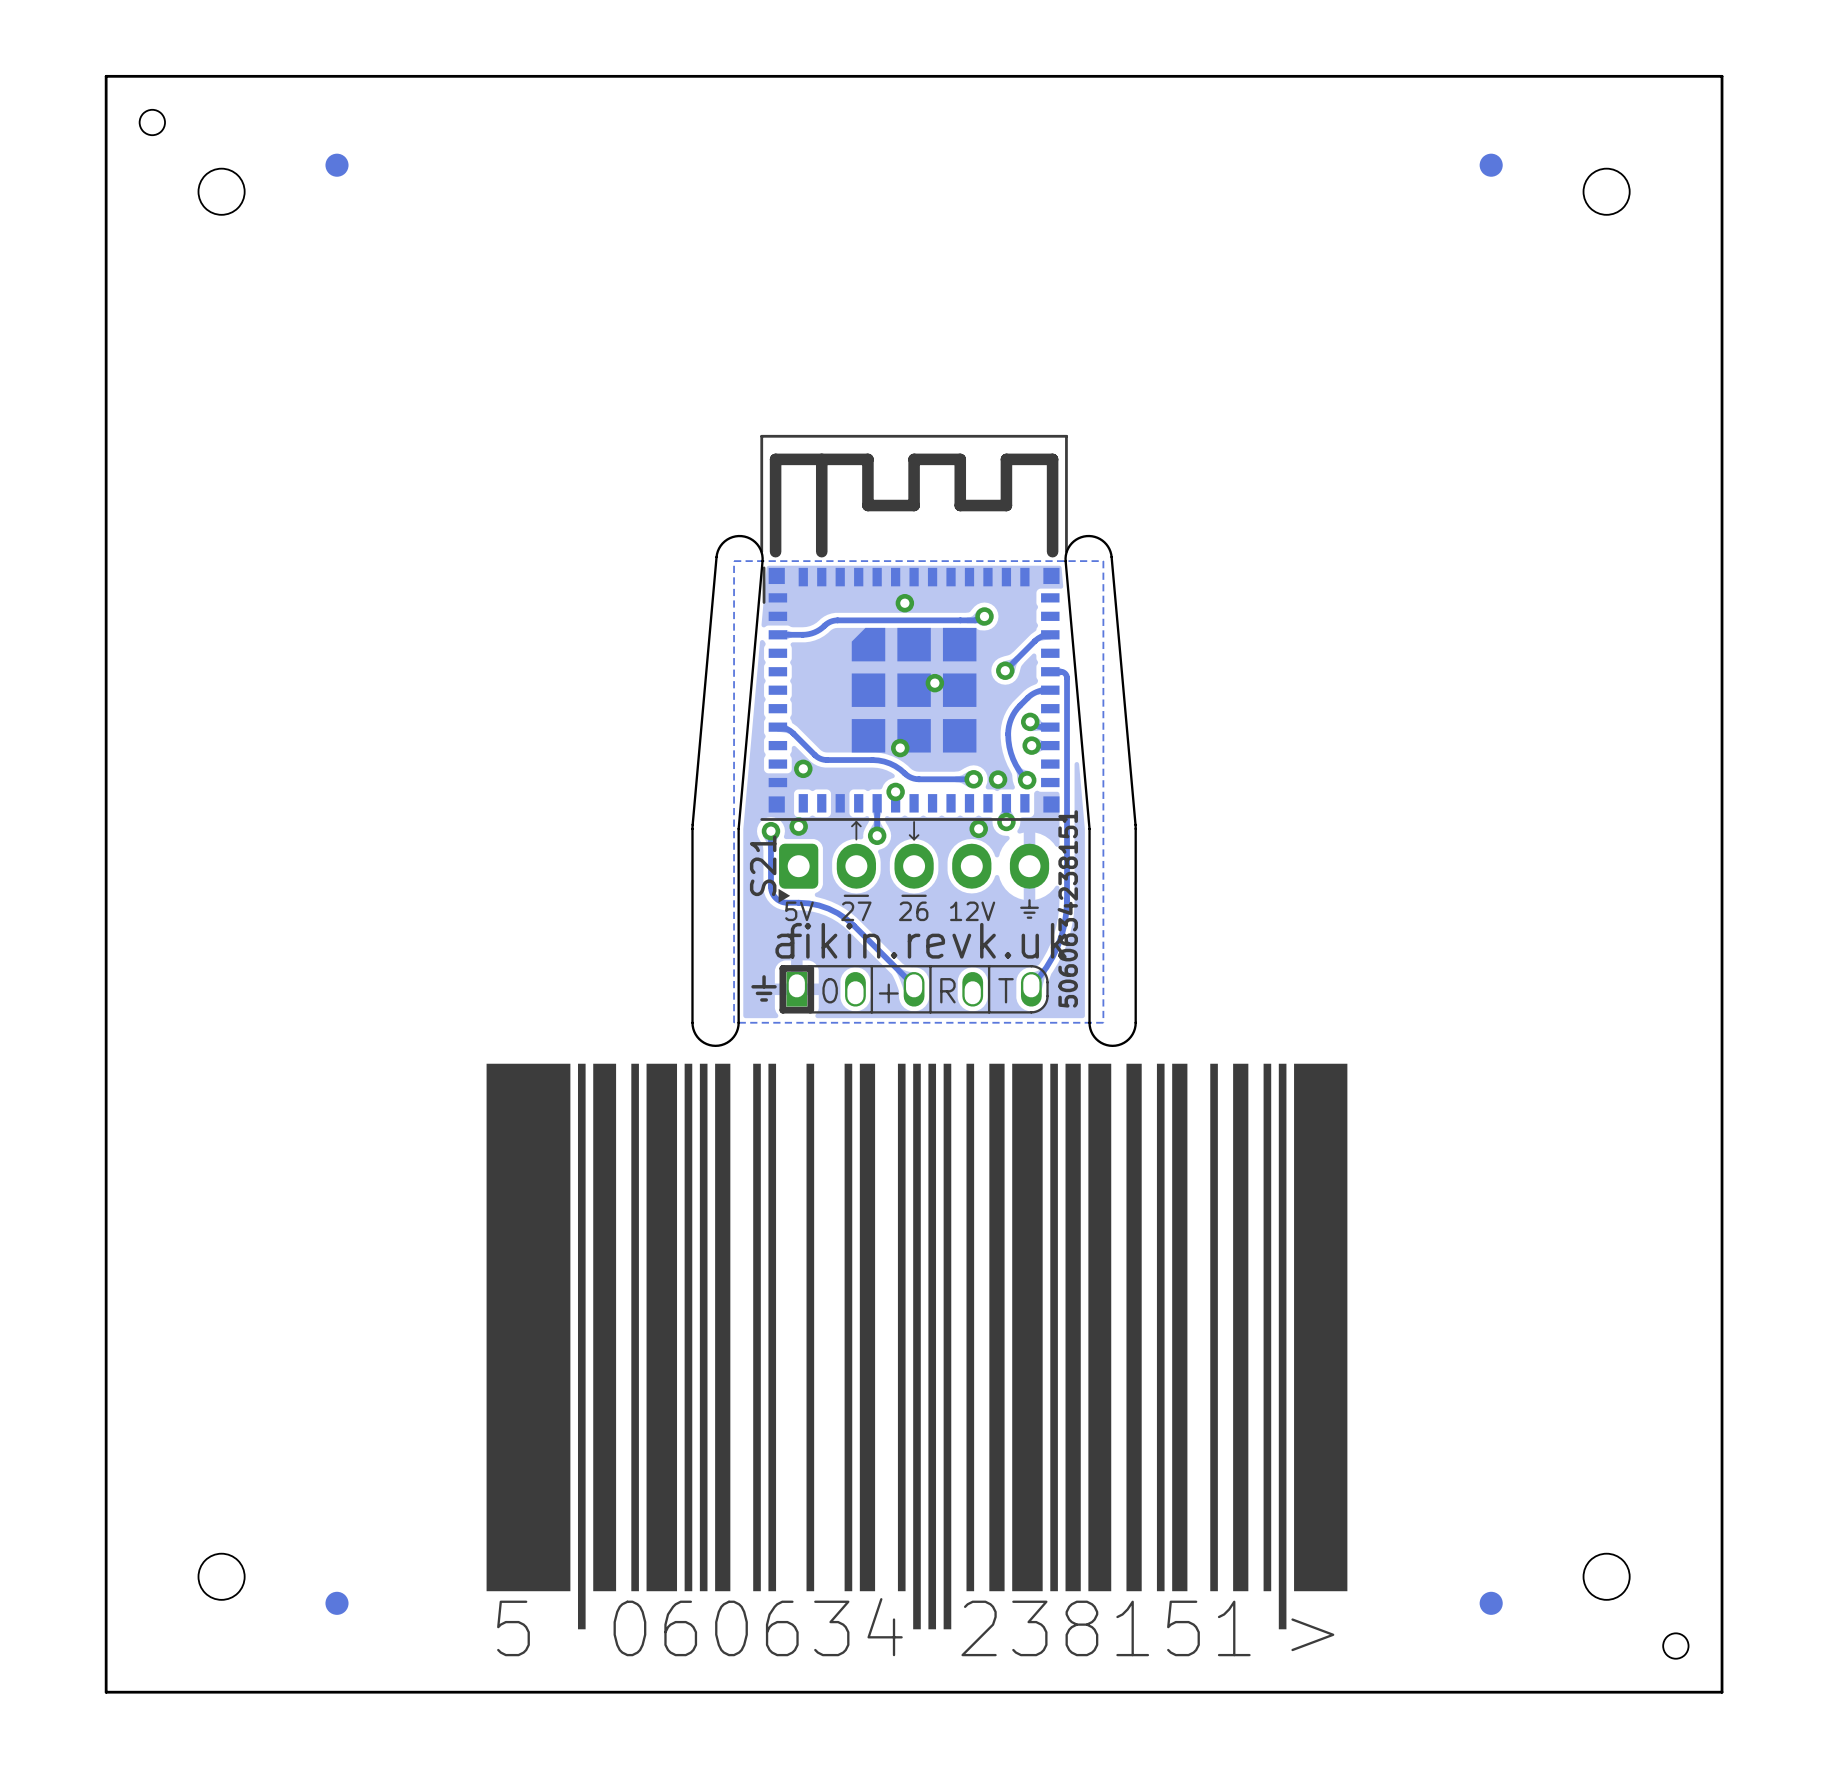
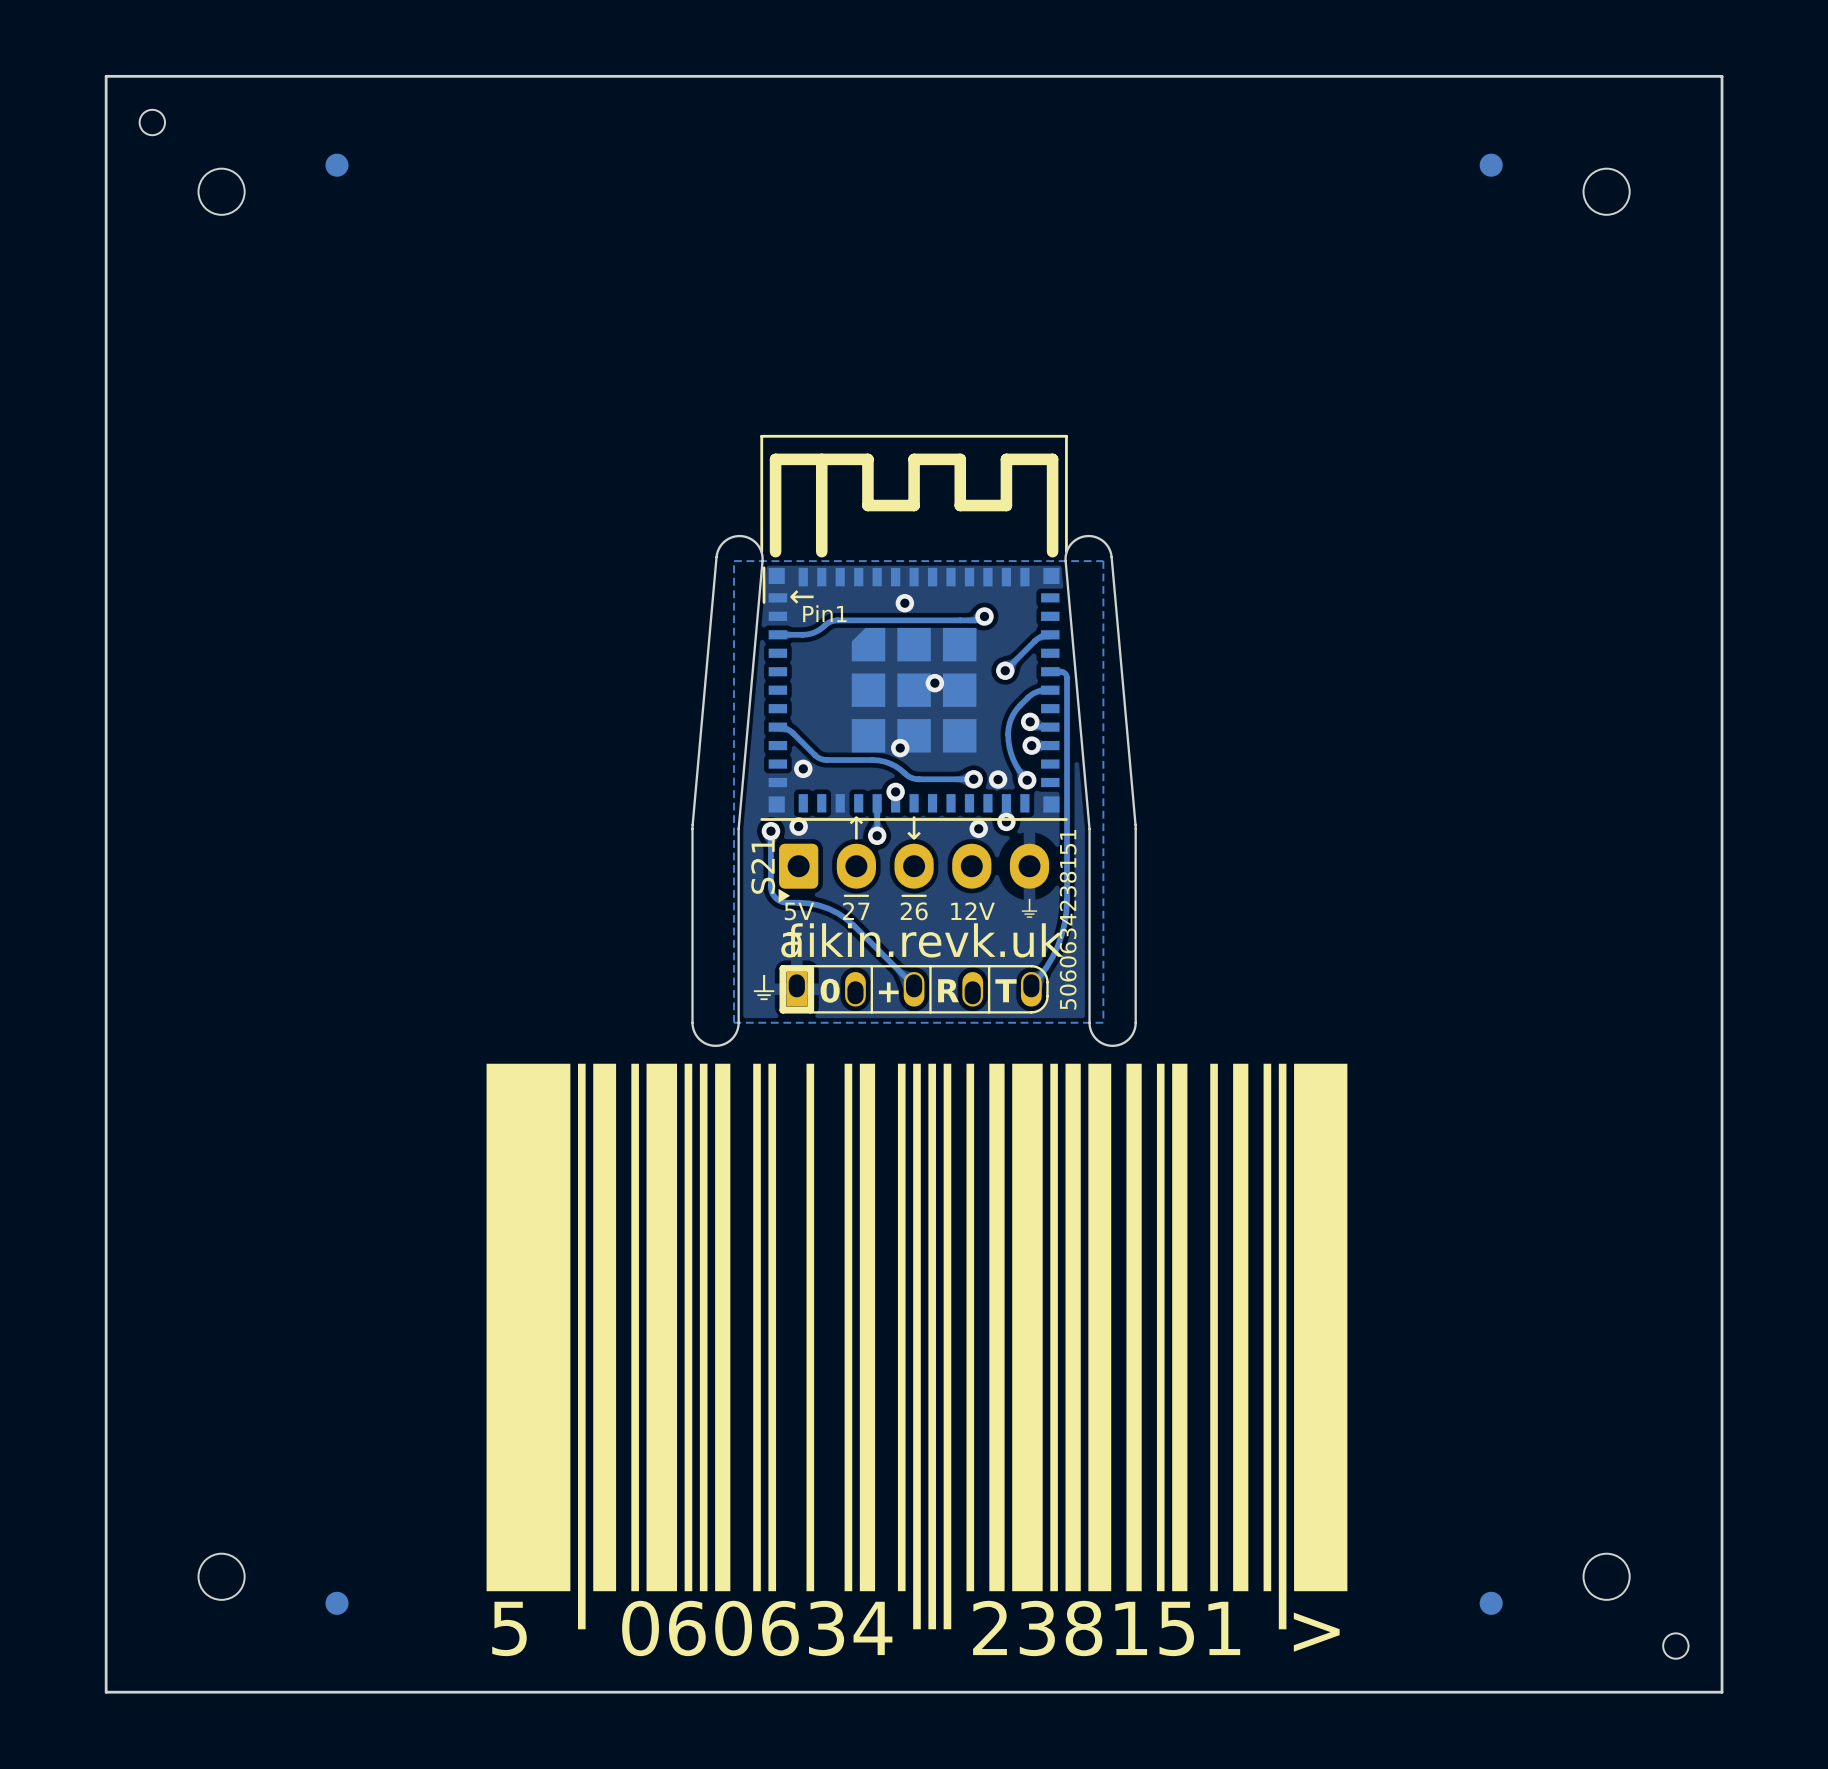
part text: none -> ← (802, 596)
part text: none -> Pin1 (824, 613)

